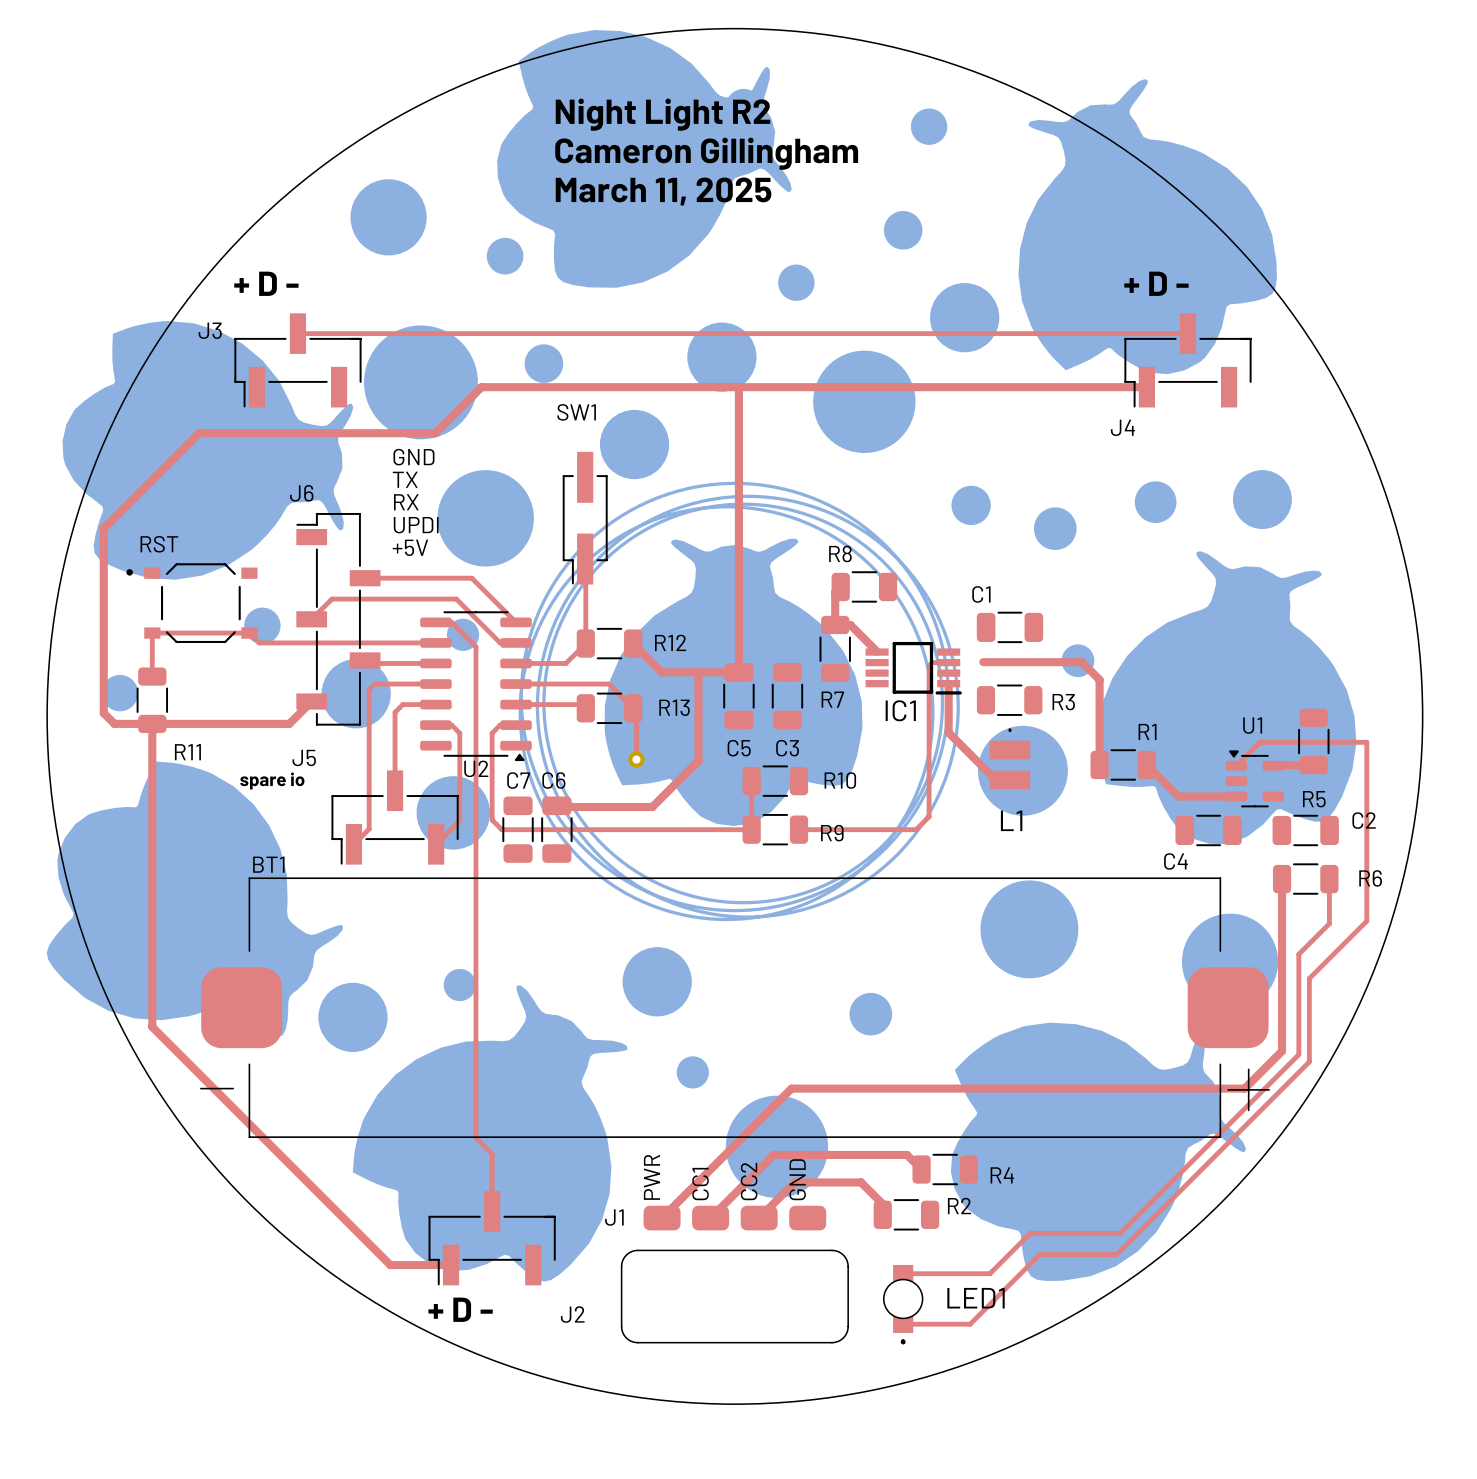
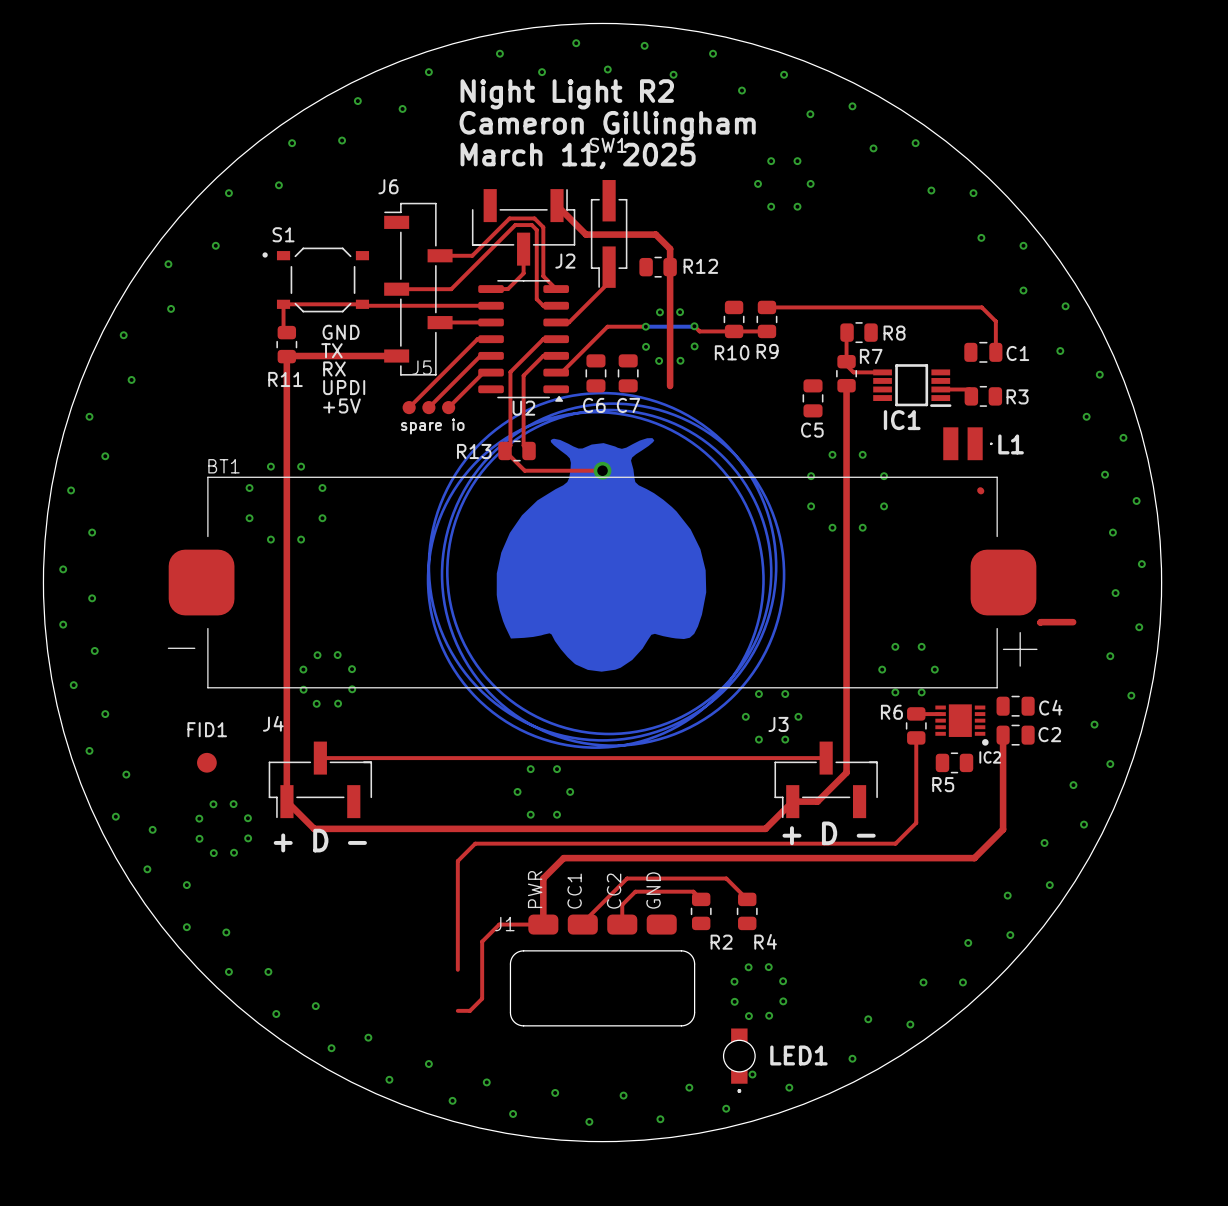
drawing: [486, 30, 815, 301] -> none
via: none -> (576, 43)
via: none -> (644, 45)
via: none -> (499, 53)
via: none -> (713, 53)
drawing: [813, 79, 1277, 453] -> none
via: none -> (607, 69)
via: none -> (428, 72)
via: none -> (542, 72)
via: none -> (673, 74)
via: none -> (784, 74)
drawing: [910, 108, 948, 145] -> none
via: none -> (741, 90)
via: none -> (357, 101)
via: none -> (852, 106)
via: none -> (402, 108)
via: none -> (810, 114)
via: none -> (342, 140)
via: none -> (292, 143)
via: none -> (915, 143)
drawing: [350, 179, 427, 256] -> none
via: none -> (873, 148)
via: none -> (771, 161)
via: none -> (797, 161)
drawing: [883, 210, 923, 250] -> none
via: none -> (758, 183)
via: none -> (810, 183)
via: none -> (278, 185)
via: none -> (931, 190)
via: none -> (228, 193)
via: none -> (973, 193)
top track: none -> (557, 205) (586, 234) (655, 234) (670, 248) (670, 386)
via: none -> (771, 206)
via: none -> (797, 206)
text: + D - (266, 283) -> none
text: + D - (1156, 283) -> none
via: none -> (981, 237)
via: none -> (215, 245)
via: none -> (1023, 245)
top track: none -> (523, 249) (523, 273) (507, 289) (491, 289)
top track: none -> (440, 255) (472, 255) (509, 218) (534, 218) (543, 227) (543, 276) (556, 289)
drawing: [62, 321, 478, 580] -> none
drawing: [687, 322, 757, 392] -> none
via: none -> (168, 264)
top track: none -> (609, 267) (609, 282) (568, 322) (556, 322)
J3 name position: J3 (210, 330) -> J3 (778, 724)
top track: (297, 333) (1187, 333) -> none
S1: none -> (315, 279)
drawing: [524, 344, 564, 383] -> none
top track: none -> (396, 289) (451, 289) (515, 225) (531, 225) (536, 229) (536, 299) (543, 305) (556, 305)
via: none -> (1023, 290)
J3 position: (297, 360) -> (826, 779)
J4 position: (1187, 360) -> (320, 779)
top track: none -> (491, 305) (283, 304) (283, 329) (286, 332)
via: none -> (1065, 306)
top track: none -> (766, 307) (981, 307) (995, 321) (995, 352)
via: none -> (171, 308)
via: none -> (680, 312)
via: none -> (659, 312)
top track: (738, 387) (738, 672) (661, 672) (633, 643) -> none
top track: (1146, 387) (481, 387) (435, 433) (199, 433) (103, 528) (103, 713) (114, 723) (289, 723) (311, 701) -> none
top track: none -> (440, 322) (491, 322)
top track: none -> (645, 326) (607, 326) (561, 372) (556, 372)
via: none -> (645, 326)
top track: none -> (694, 326) (699, 331) (766, 331)
bottom track: none -> (694, 326) (645, 326)
via: none -> (694, 326)
top track: none -> (847, 332) (846, 365) (853, 372) (882, 372)
drawing: [599, 409, 670, 480] -> none
via: none -> (123, 335)
SW1 name position: SW1 (576, 412) -> SW1 (608, 145)
top track: none -> (491, 339) (477, 339) (409, 407)
top track: none -> (556, 339) (543, 339) (510, 372) (510, 445) (505, 450) (524, 470) (602, 470)
via: none -> (694, 346)
via: none -> (646, 346)
J4 name position: J4 (1122, 427) -> J4 (273, 723)
via: none -> (1060, 351)
top track: none -> (396, 356) (286, 356) (286, 801) (314, 828) (765, 828) (792, 801) (817, 801) (846, 772) (846, 385)
top track: none -> (491, 355) (480, 355) (428, 407)
top track: none -> (556, 355) (543, 355) (523, 375) (523, 445) (529, 450)
via: none -> (659, 360)
via: none -> (680, 360)
text position: GND (413, 457) -> GND (341, 332)
top track: none -> (491, 372) (483, 372) (448, 407)
via: none -> (1099, 374)
via: none -> (131, 379)
drawing: [437, 470, 534, 567] -> none
drawing: [1232, 470, 1292, 530] -> none
top track: none -> (940, 389) (970, 390)
text position: TX (405, 479) -> TX (331, 350)
drawing: [1134, 481, 1177, 523] -> none
drawing: [951, 485, 991, 526] -> none
text position: RX (406, 502) -> RX (334, 369)
drawing: [1033, 507, 1077, 550] -> none
via: none -> (89, 416)
via: none -> (1086, 416)
SW1 position: (585, 518) -> (609, 233)
text position: UPDI (416, 525) -> UPDI (344, 387)
part footprint: [604, 538, 863, 827] -> [496, 438, 707, 672]
via: none -> (1123, 437)
text position: +5V (410, 547) -> +5V (341, 405)
drawing: [1061, 551, 1357, 845] -> none
R8 name position: R8 (840, 553) -> R8 (894, 333)
top track: (585, 559) (585, 643) (565, 663) (516, 663) -> none
via: none -> (832, 454)
via: none -> (862, 454)
via: none -> (105, 456)
R8 footprint: [831, 571, 898, 603] -> [840, 322, 878, 344]
via: none -> (270, 466)
via: none -> (301, 466)
top track: (365, 578) (471, 578) (516, 622) -> none
via: none -> (1105, 474)
via: none -> (811, 476)
via: none -> (884, 476)
top track: (840, 586) (835, 592) (835, 624) (850, 624) (877, 651) -> none
C1 name position: C1 (981, 594) -> C1 (1017, 353)
via: none -> (249, 488)
via: none -> (322, 488)
via: none -> (71, 490)
RST: (191, 603) -> none
top track: none -> (980, 490) (981, 491)
drawing: [244, 607, 281, 644] -> none
C1 footprint: [976, 611, 1044, 644] -> [964, 341, 1003, 363]
R7 footprint: [819, 615, 851, 683] -> [836, 354, 858, 393]
via: none -> (1136, 500)
drawing: [446, 618, 480, 651] -> none
top track: (311, 619) (331, 599) (456, 599) (500, 642) (516, 642) -> none
J6 position: (338, 619) -> (418, 289)
top track: (435, 622) (451, 622) (475, 646) (475, 1137) (492, 1154) (492, 1211) -> none
via: none -> (811, 506)
via: none -> (884, 506)
R12 footprint: [576, 627, 643, 660] -> [639, 256, 677, 278]
via: none -> (249, 518)
via: none -> (322, 518)
top track: (435, 642) (259, 642) (249, 633) (152, 633) (152, 676) -> none
via: none -> (832, 527)
via: none -> (862, 527)
via: none -> (92, 532)
via: none -> (1112, 532)
drawing: [321, 659, 391, 729] -> none
top track: (365, 660) (368, 663) (435, 663) -> none
top track: (948, 662) (932, 662) (929, 665) (929, 816) (916, 829) (799, 829) -> none
top track: (983, 662) (1082, 662) (1099, 679) (1099, 764) -> none
via: none -> (270, 539)
via: none -> (301, 539)
C5 footprint: [723, 663, 755, 730] -> [802, 379, 824, 418]
R11 footprint: [136, 667, 169, 733] -> [276, 325, 298, 364]
IC1 position: (913, 668) -> (912, 385)
top track: (698, 672) (698, 760) (652, 807) (558, 807) (556, 809) -> none
drawing: [101, 674, 139, 712] -> none
top track: (435, 684) (374, 684) (369, 689) (369, 829) (353, 844) -> none
top track: (516, 684) (608, 684) (633, 708) -> none
top track: (948, 684) (948, 732) (992, 776) (1009, 776) (1009, 779) -> none
R3 footprint: [976, 684, 1043, 716] -> [964, 385, 1003, 407]
U2 position: (475, 686) -> (523, 340)
R13 footprint: [576, 692, 643, 725] -> [498, 440, 536, 462]
via: none -> (1141, 564)
C3: (787, 696) -> none
R7 name position: R7 (832, 699) -> R7 (871, 356)
via: none -> (63, 569)
top track: (435, 704) (402, 704) (395, 712) (395, 790) -> none
top track: (516, 704) (582, 704) (585, 708) -> none
R13 name position: R13 (674, 707) -> R13 (474, 451)
top track: (637, 708) (636, 759) -> none
R5 footprint: [1298, 708, 1330, 775] -> [935, 752, 974, 774]
top track: (152, 723) (152, 1027) (390, 1265) (451, 1265) -> none
top track: (435, 725) (451, 725) (459, 733) (459, 820) (436, 844) -> none
top track: (516, 725) (500, 725) (492, 733) (492, 819) (501, 829) (751, 829) (751, 781) -> none
drawing: [977, 725, 1068, 816] -> none
via: none -> (1115, 593)
via: none -> (92, 598)
R11 name position: R11 (187, 752) -> R11 (285, 379)
J5 name position: J5 (304, 757) -> J5 (422, 367)
L1 rotation: 0° (1009, 758) -> 90° clockwise (967, 443)
L1 position: (1009, 758) -> (967, 443)
drawing: [46, 761, 692, 1282] -> none
R1: (1123, 764) -> none
top track: (1146, 764) (1178, 796) (1236, 796) -> none
R10 footprint: [742, 765, 809, 797] -> [723, 300, 745, 339]
top track: (1236, 765) (1260, 742) (1366, 742) (1366, 921) (1309, 978) (1309, 1061) (1116, 1254) (1039, 1254) (970, 1324) (900, 1324) -> none
via: none -> (63, 624)
J5 footprint: [331, 770, 459, 865] -> [402, 401, 456, 415]
via: none -> (1139, 627)
drawing: [416, 776, 491, 850] -> none
U1: (1254, 778) -> none
text position: spare io (272, 780) -> spare io (432, 426)
C7 name position: C7 (518, 780) -> C7 (628, 405)
C6 name position: C6 (553, 780) -> C6 (594, 405)
R10 name position: R10 (840, 780) -> R10 (732, 352)
via: none -> (895, 646)
via: none -> (921, 646)
C7 footprint: [502, 796, 534, 863] -> [617, 354, 639, 393]
C6 footprint: [541, 796, 573, 863] -> [585, 354, 607, 393]
R5 name position: R5 (1314, 799) -> R5 (943, 784)
via: none -> (94, 650)
via: none -> (317, 655)
via: none -> (337, 655)
via: none -> (1110, 656)
R9 footprint: [742, 813, 809, 846] -> [756, 300, 778, 339]
C4 footprint: [1175, 814, 1242, 847] -> [996, 695, 1035, 717]
C2 footprint: [1272, 814, 1339, 847] -> [996, 724, 1035, 746]
L1 name position: L1 (1011, 820) -> L1 (1011, 444)
via: none -> (352, 669)
via: none -> (303, 669)
via: none -> (882, 669)
via: none -> (934, 669)
R9 name position: R9 (832, 833) -> R9 (767, 351)
via: none -> (73, 685)
via: none -> (352, 689)
via: none -> (303, 689)
via: none -> (895, 692)
via: none -> (921, 692)
via: none -> (758, 694)
via: none -> (785, 694)
via: none -> (1131, 695)
C4 name position: C4 (1175, 861) -> C4 (1050, 707)
R6 footprint: [1272, 863, 1339, 895] -> [905, 707, 927, 745]
via: none -> (316, 703)
via: none -> (338, 703)
via: none -> (105, 714)
top track: none -> (916, 714) (940, 714)
R6 name position: R6 (1370, 878) -> R6 (891, 712)
top track: (1329, 879) (1329, 923) (1298, 954) (1298, 1054) (1120, 1233) (1030, 1233) (989, 1273) (900, 1273) -> none
drawing: [980, 880, 1079, 979] -> none
via: none -> (745, 716)
via: none -> (798, 716)
top track: (1282, 883) (1282, 1051) (1244, 1088) (791, 1088) (662, 1218) -> none
IC2: none -> (961, 725)
via: none -> (1094, 724)
top track: none -> (916, 737) (916, 822) (895, 843) (475, 843) (457, 861) (457, 969)
via: none -> (758, 739)
via: none -> (785, 739)
top track: none -> (1003, 739) (1003, 829) (974, 858) (563, 858) (543, 878) (543, 922)
drawing: [950, 913, 1279, 1282] -> none
via: none -> (89, 750)
top track: none -> (320, 758) (826, 758)
FID1: none -> (206, 762)
via: none -> (1110, 764)
via: none -> (530, 769)
via: none -> (557, 769)
via: none -> (126, 774)
via: none -> (1073, 785)
via: none -> (517, 791)
via: none -> (570, 791)
via: none -> (233, 804)
via: none -> (213, 804)
drawing: [849, 992, 893, 1036] -> none
via: none -> (530, 814)
via: none -> (557, 814)
via: none -> (115, 816)
via: none -> (199, 818)
via: none -> (247, 818)
BT1 position: (735, 1007) -> (602, 582)
via: none -> (1083, 824)
via: none -> (152, 829)
text: none -> + D - (829, 833)
via: none -> (199, 838)
via: none -> (248, 838)
via: none -> (1044, 843)
via: none -> (234, 852)
via: none -> (213, 853)
drawing: [676, 1056, 829, 1199] -> none
via: none -> (147, 869)
via: none -> (186, 885)
via: none -> (1049, 885)
via: none -> (1007, 895)
top track: none -> (701, 899) (693, 891) (635, 891) (622, 904) (622, 922)
top track: none -> (747, 899) (726, 878) (627, 878) (582, 922)
top track: none -> (543, 924) (499, 924) (482, 941) (482, 998) (470, 1010) (457, 1010)
via: none -> (186, 927)
via: none -> (226, 932)
via: none -> (1010, 935)
R4 footprint: [912, 1153, 979, 1186] -> [736, 892, 758, 931]
via: none -> (968, 942)
top track: (921, 1169) (907, 1154) (773, 1154) (710, 1218) -> none
R4 name position: R4 (1002, 1175) -> R4 (765, 941)
via: none -> (748, 967)
via: none -> (768, 967)
via: none -> (228, 971)
via: none -> (268, 971)
R2 footprint: [873, 1199, 940, 1231] -> [690, 892, 712, 931]
via: none -> (783, 981)
R2 name position: R2 (959, 1206) -> R2 (721, 942)
via: none -> (734, 981)
via: none -> (923, 982)
via: none -> (962, 982)
top track: (882, 1214) (882, 1204) (861, 1182) (794, 1182) (759, 1218) -> none
via: none -> (783, 1001)
via: none -> (734, 1001)
via: none -> (315, 1006)
J2 rotation: 0° (492, 1238) -> 180° (523, 227)
J2 position: (492, 1238) -> (523, 227)
via: none -> (276, 1014)
via: none -> (748, 1016)
via: none -> (769, 1015)
via: none -> (868, 1019)
via: none -> (910, 1024)
J1 position: (734, 1274) -> (602, 970)
via: none -> (368, 1037)
via: none -> (331, 1048)
via: none -> (852, 1058)
via: none -> (428, 1064)
text position: + D - (460, 1309) -> + D - (320, 840)
J2 name position: J2 (572, 1314) -> J2 (565, 261)
via: none -> (752, 1074)
via: none -> (389, 1079)
via: none -> (486, 1082)
via: none -> (689, 1087)
via: none -> (789, 1087)
via: none -> (555, 1092)
via: none -> (623, 1095)
via: none -> (452, 1100)
via: none -> (726, 1108)
via: none -> (513, 1113)
via: none -> (660, 1119)
via: none -> (589, 1121)

